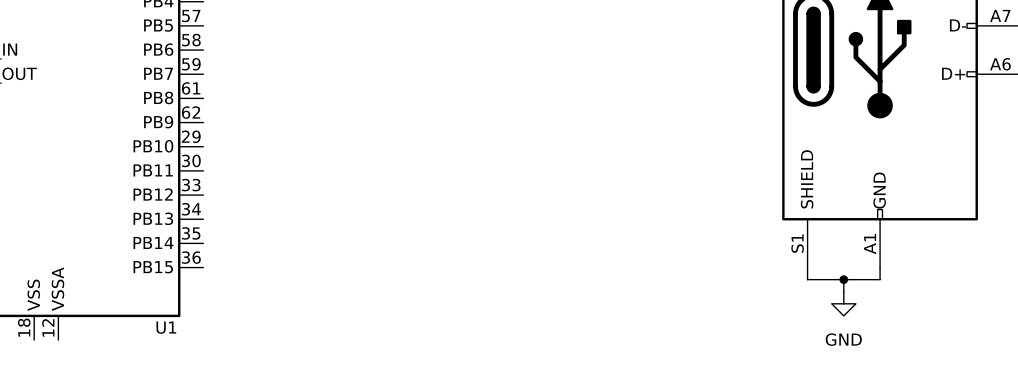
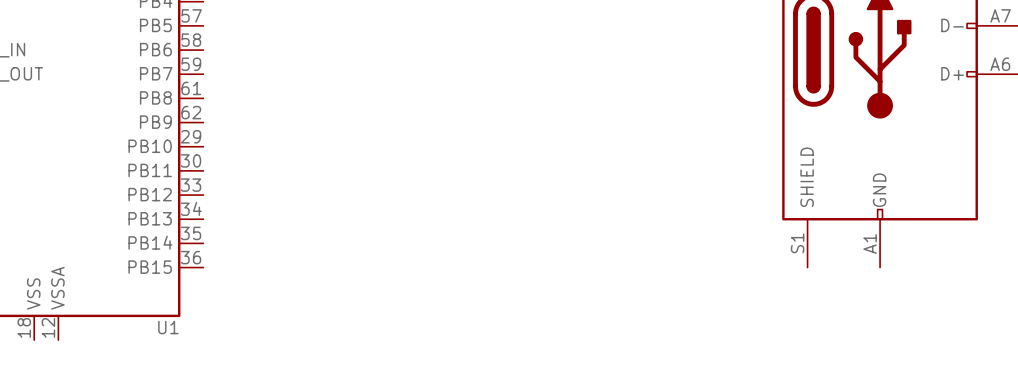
wire: (807, 267) (807, 279) (880, 279) (880, 267) -> none
wire: (843, 279) (843, 291) -> none
junction: (843, 279) -> none
power symbol: GND (843, 303) -> none

